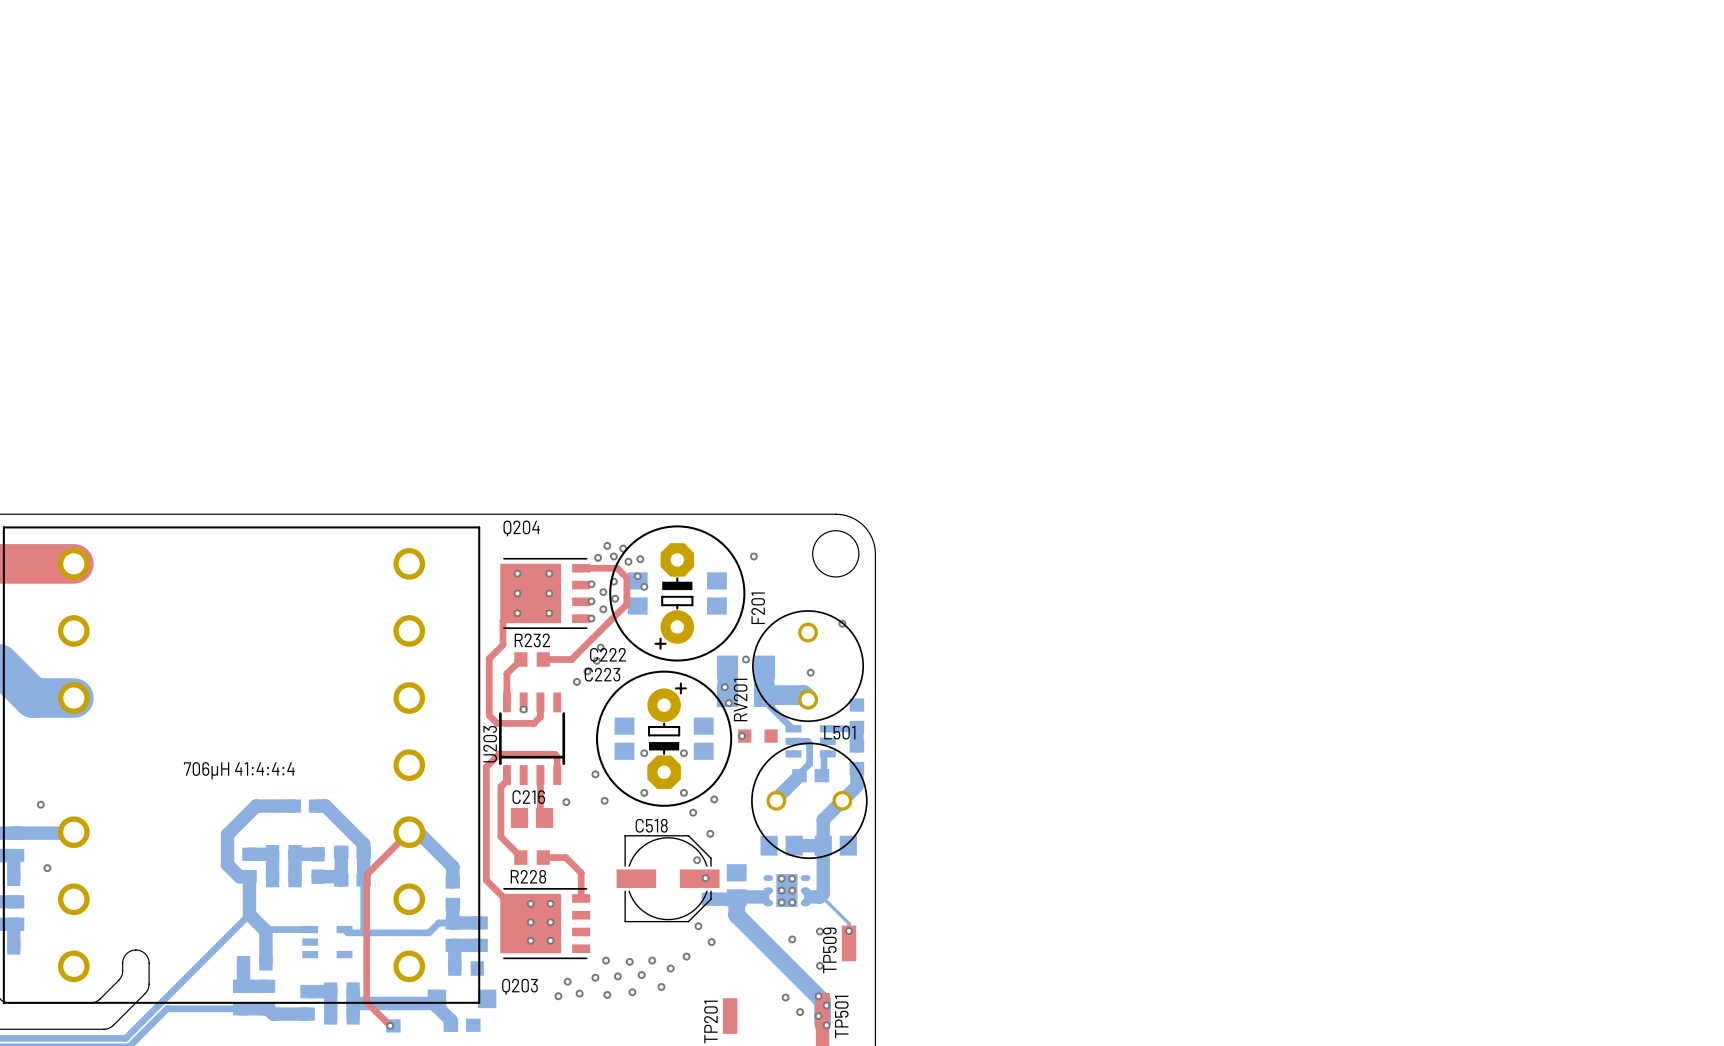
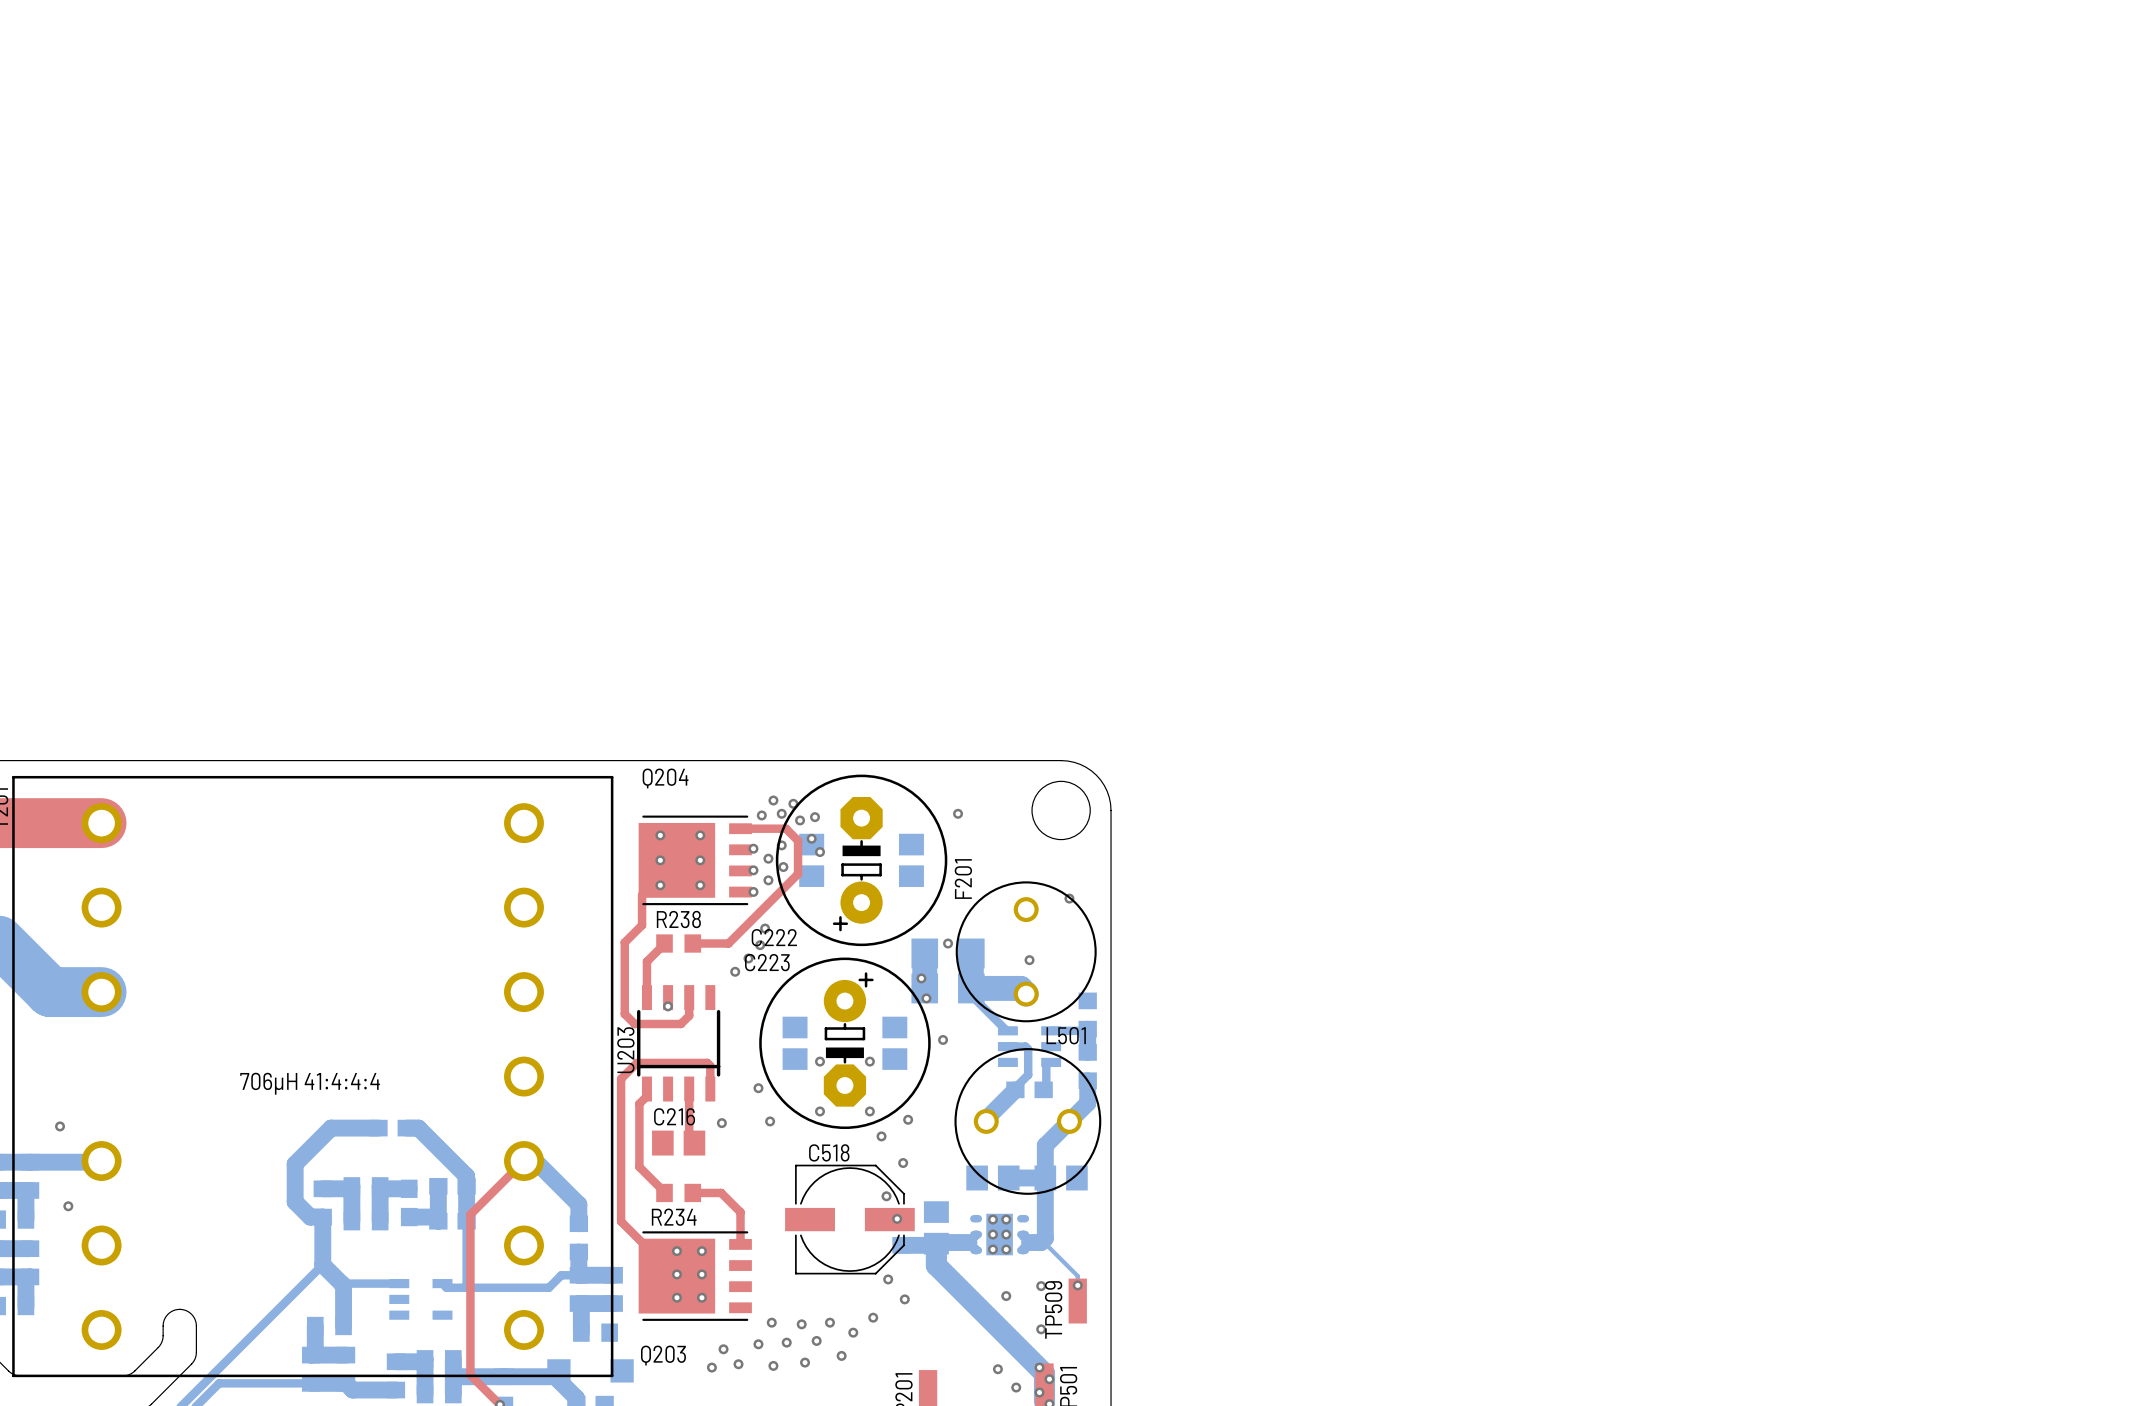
R232 name: R232 (532, 640) -> R238 (678, 919)
RV201: (757, 736) -> none
R228 name: R228 (528, 876) -> R234 (674, 1217)

